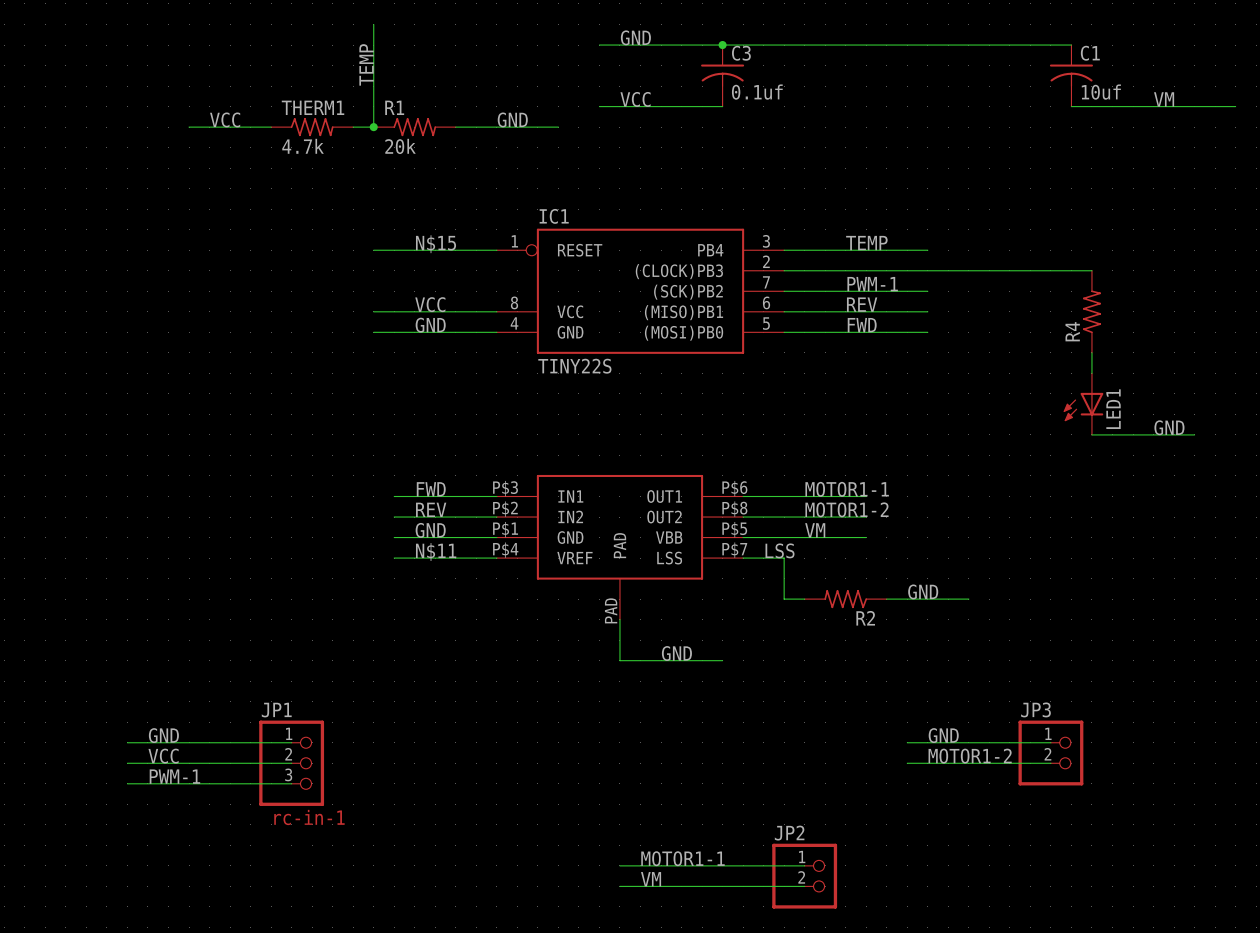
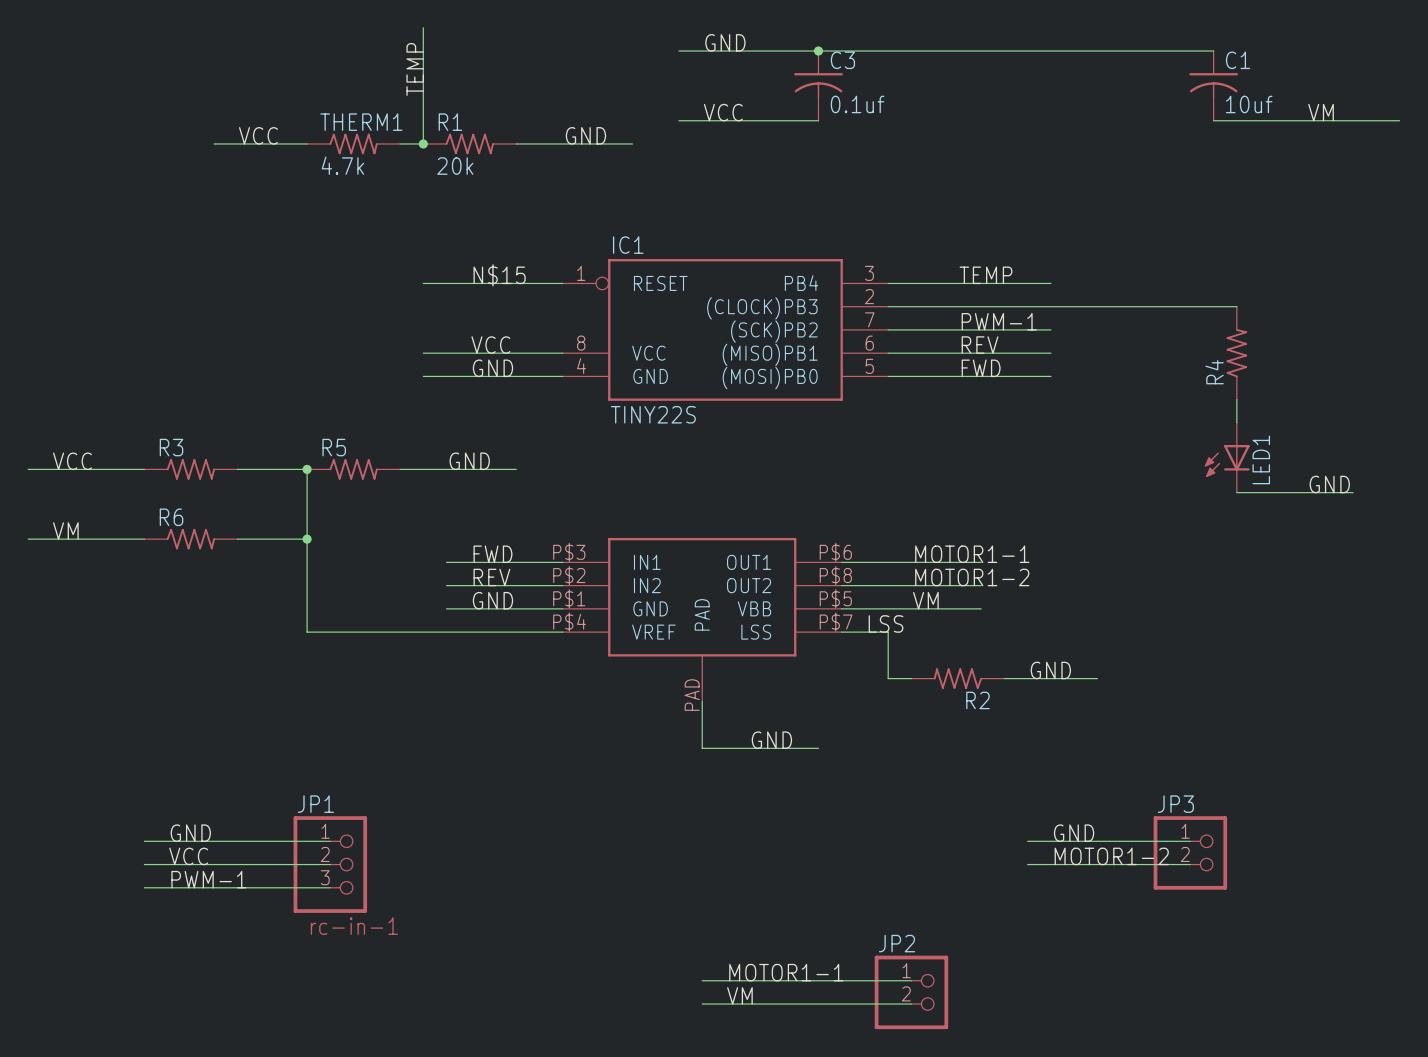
label: none -> VCC (72, 461)
label: none -> GND (469, 461)
wire: none -> (28, 469) (144, 469)
R3: none -> (190, 469)
wire: none -> (237, 469) (307, 469) (307, 632) (446, 632)
junction: none -> (307, 469)
R5: none -> (353, 469)
wire: none -> (400, 469) (516, 469)
label: none -> VM (65, 530)
wire: none -> (28, 539) (144, 539)
R6: none -> (190, 539)
wire: none -> (237, 539) (307, 539)
junction: none -> (307, 539)
label: N$11 (436, 552) -> none

